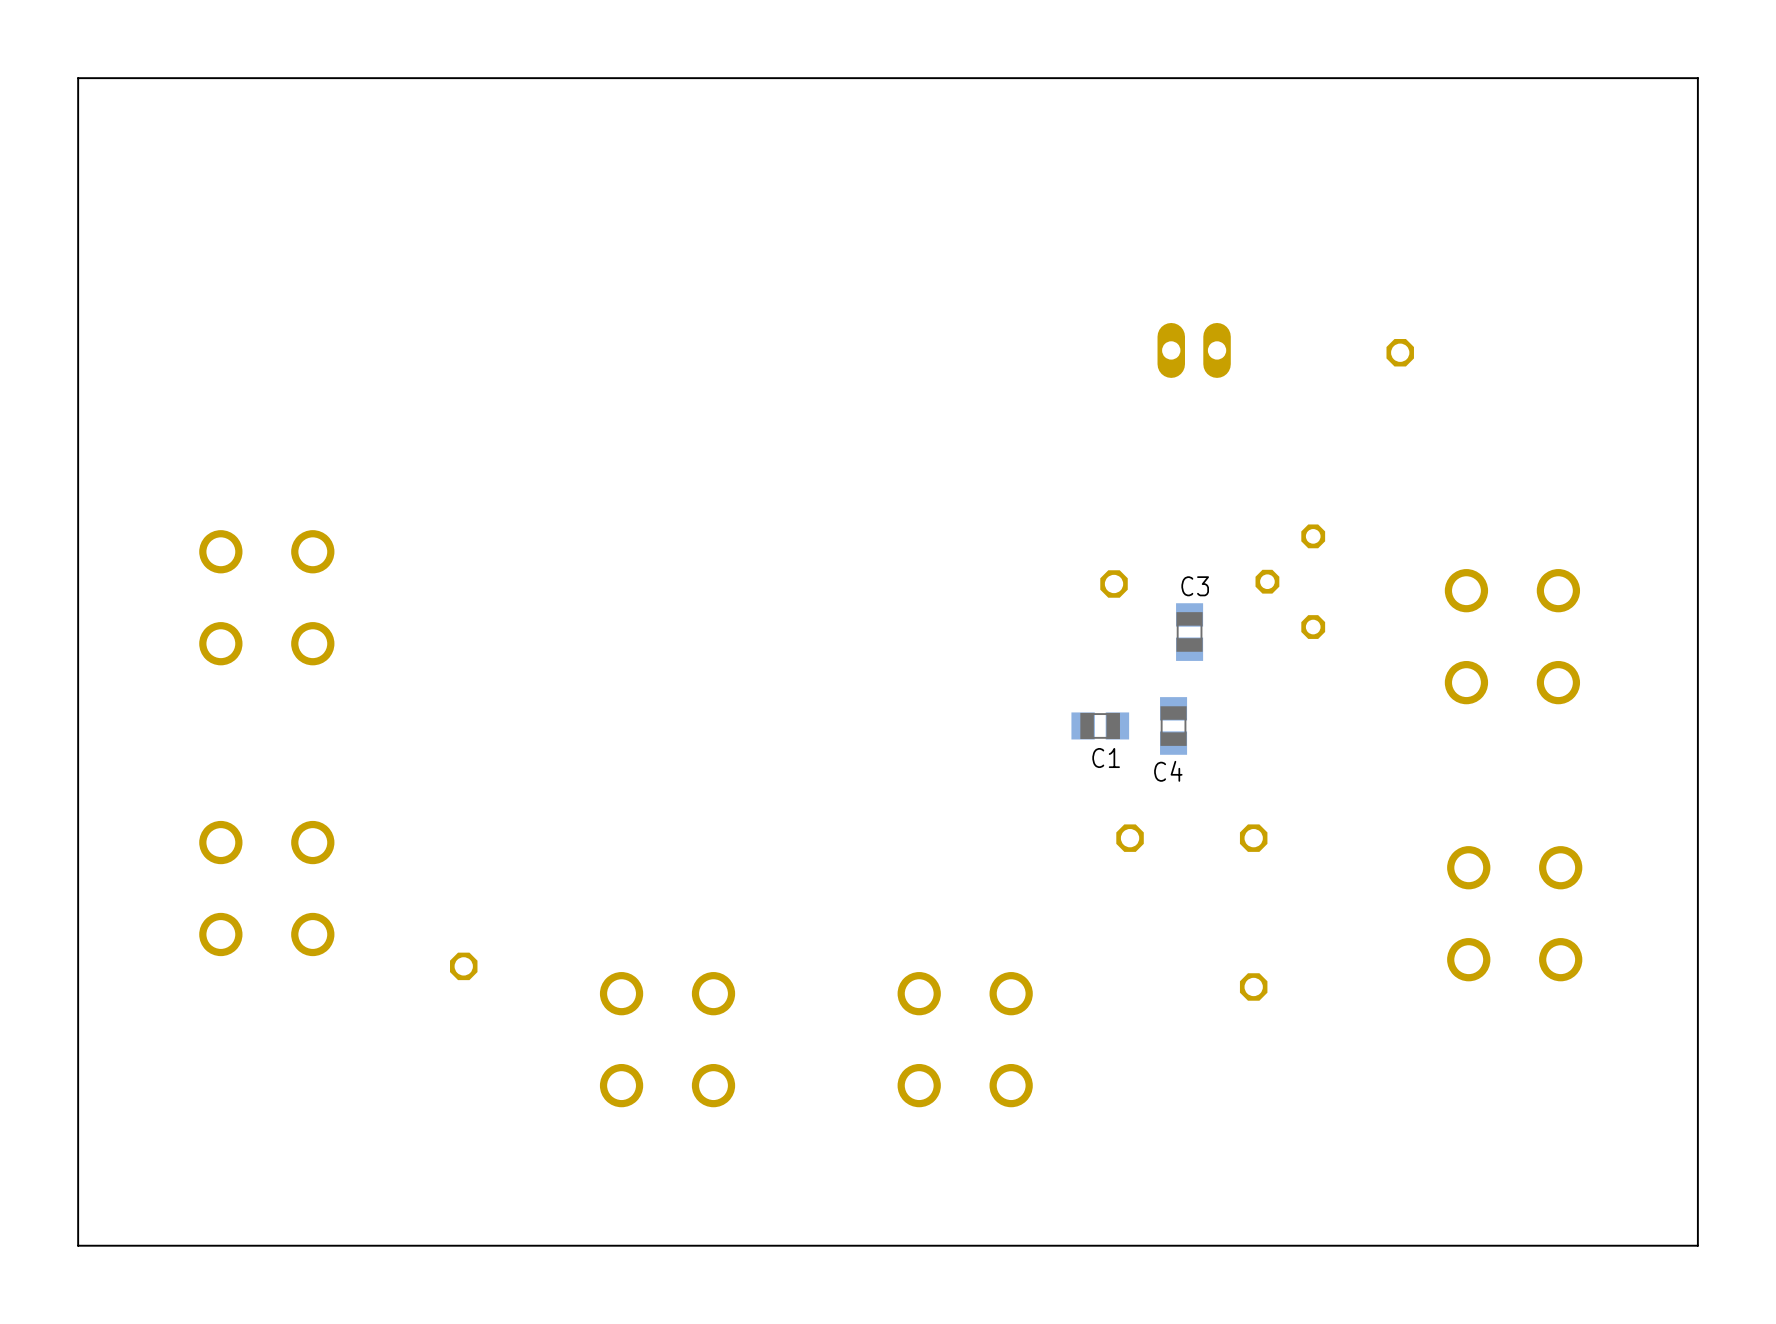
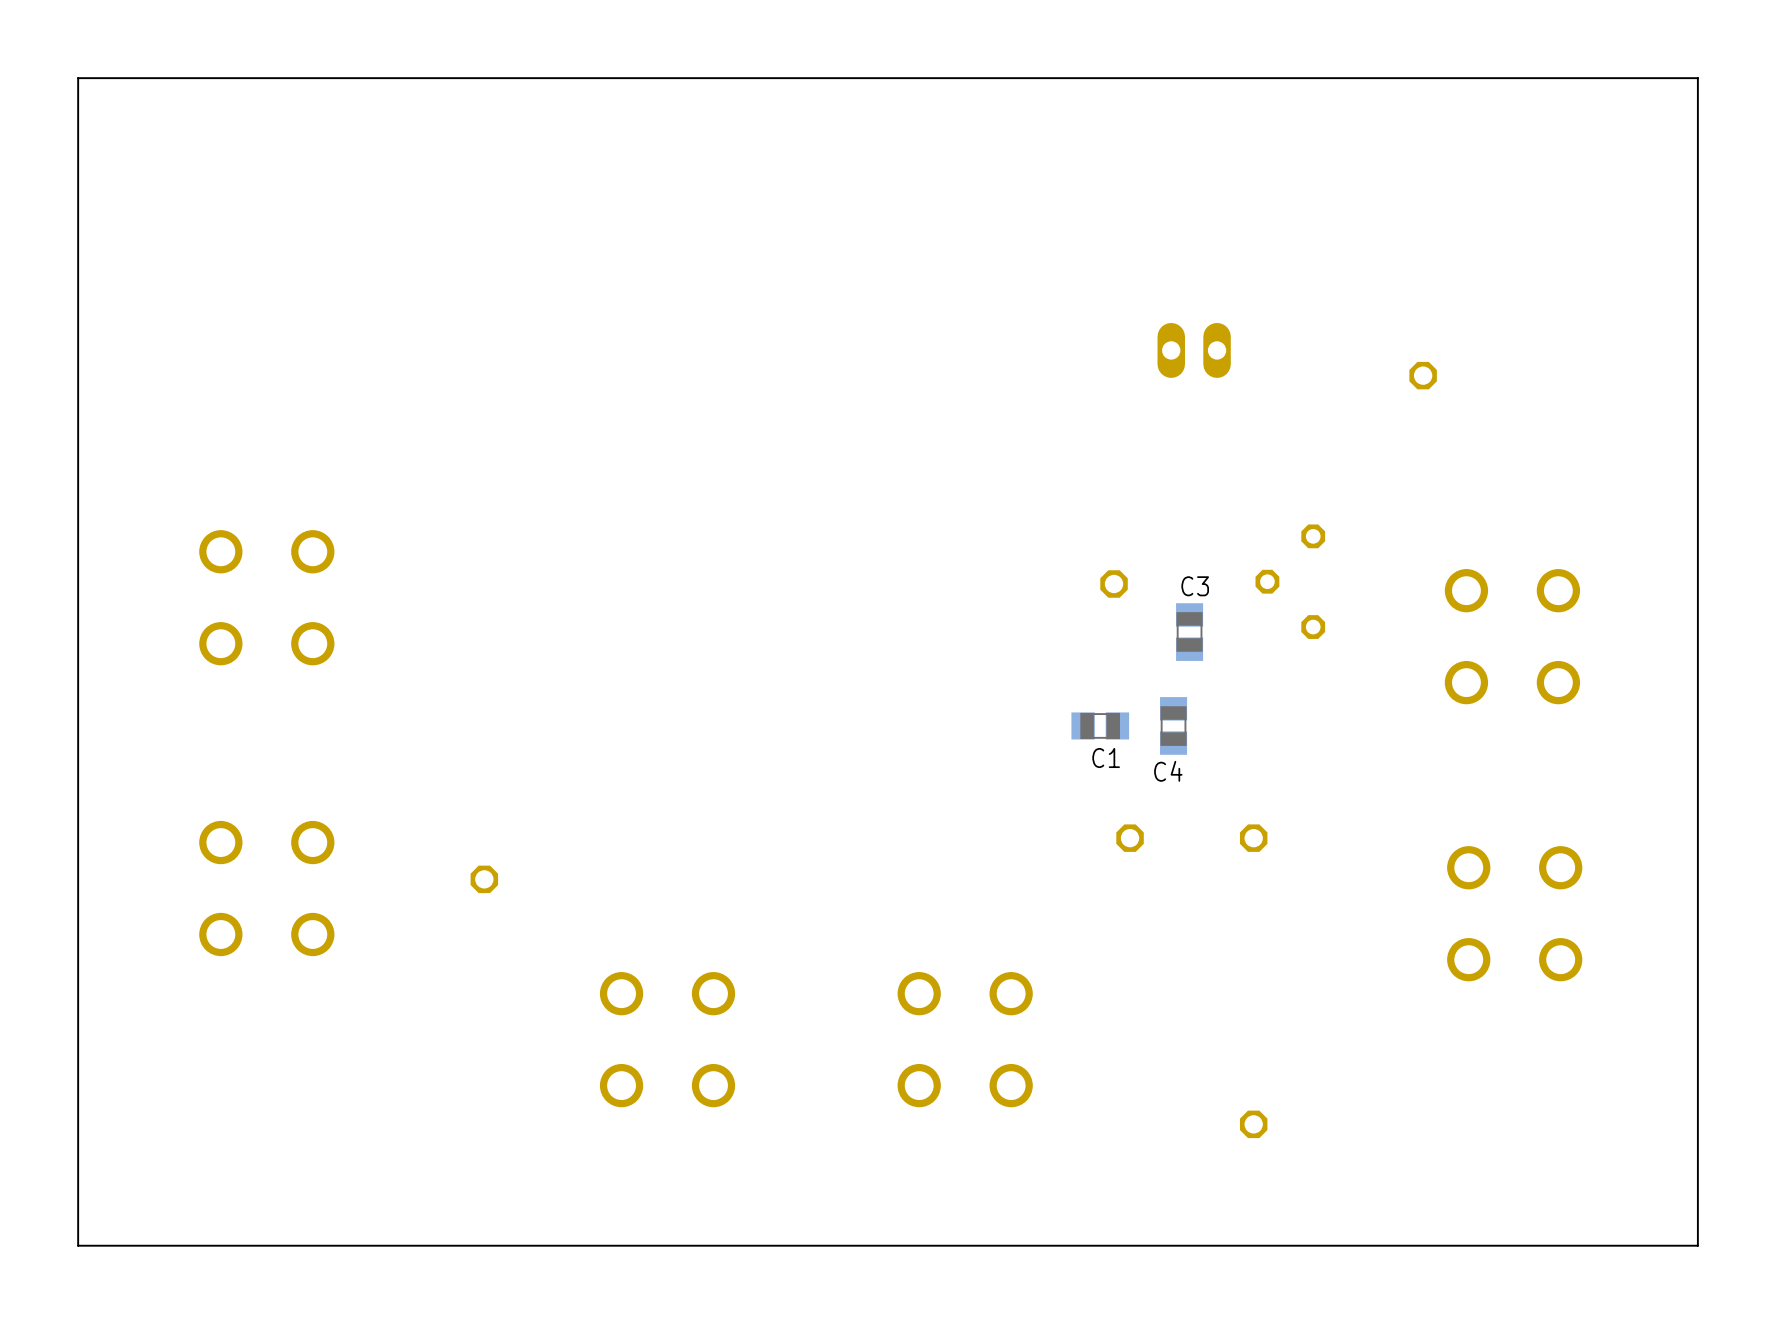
part position: (1400, 352) -> (1423, 375)
part position: (463, 966) -> (484, 879)
part position: (1253, 986) -> (1253, 1124)

